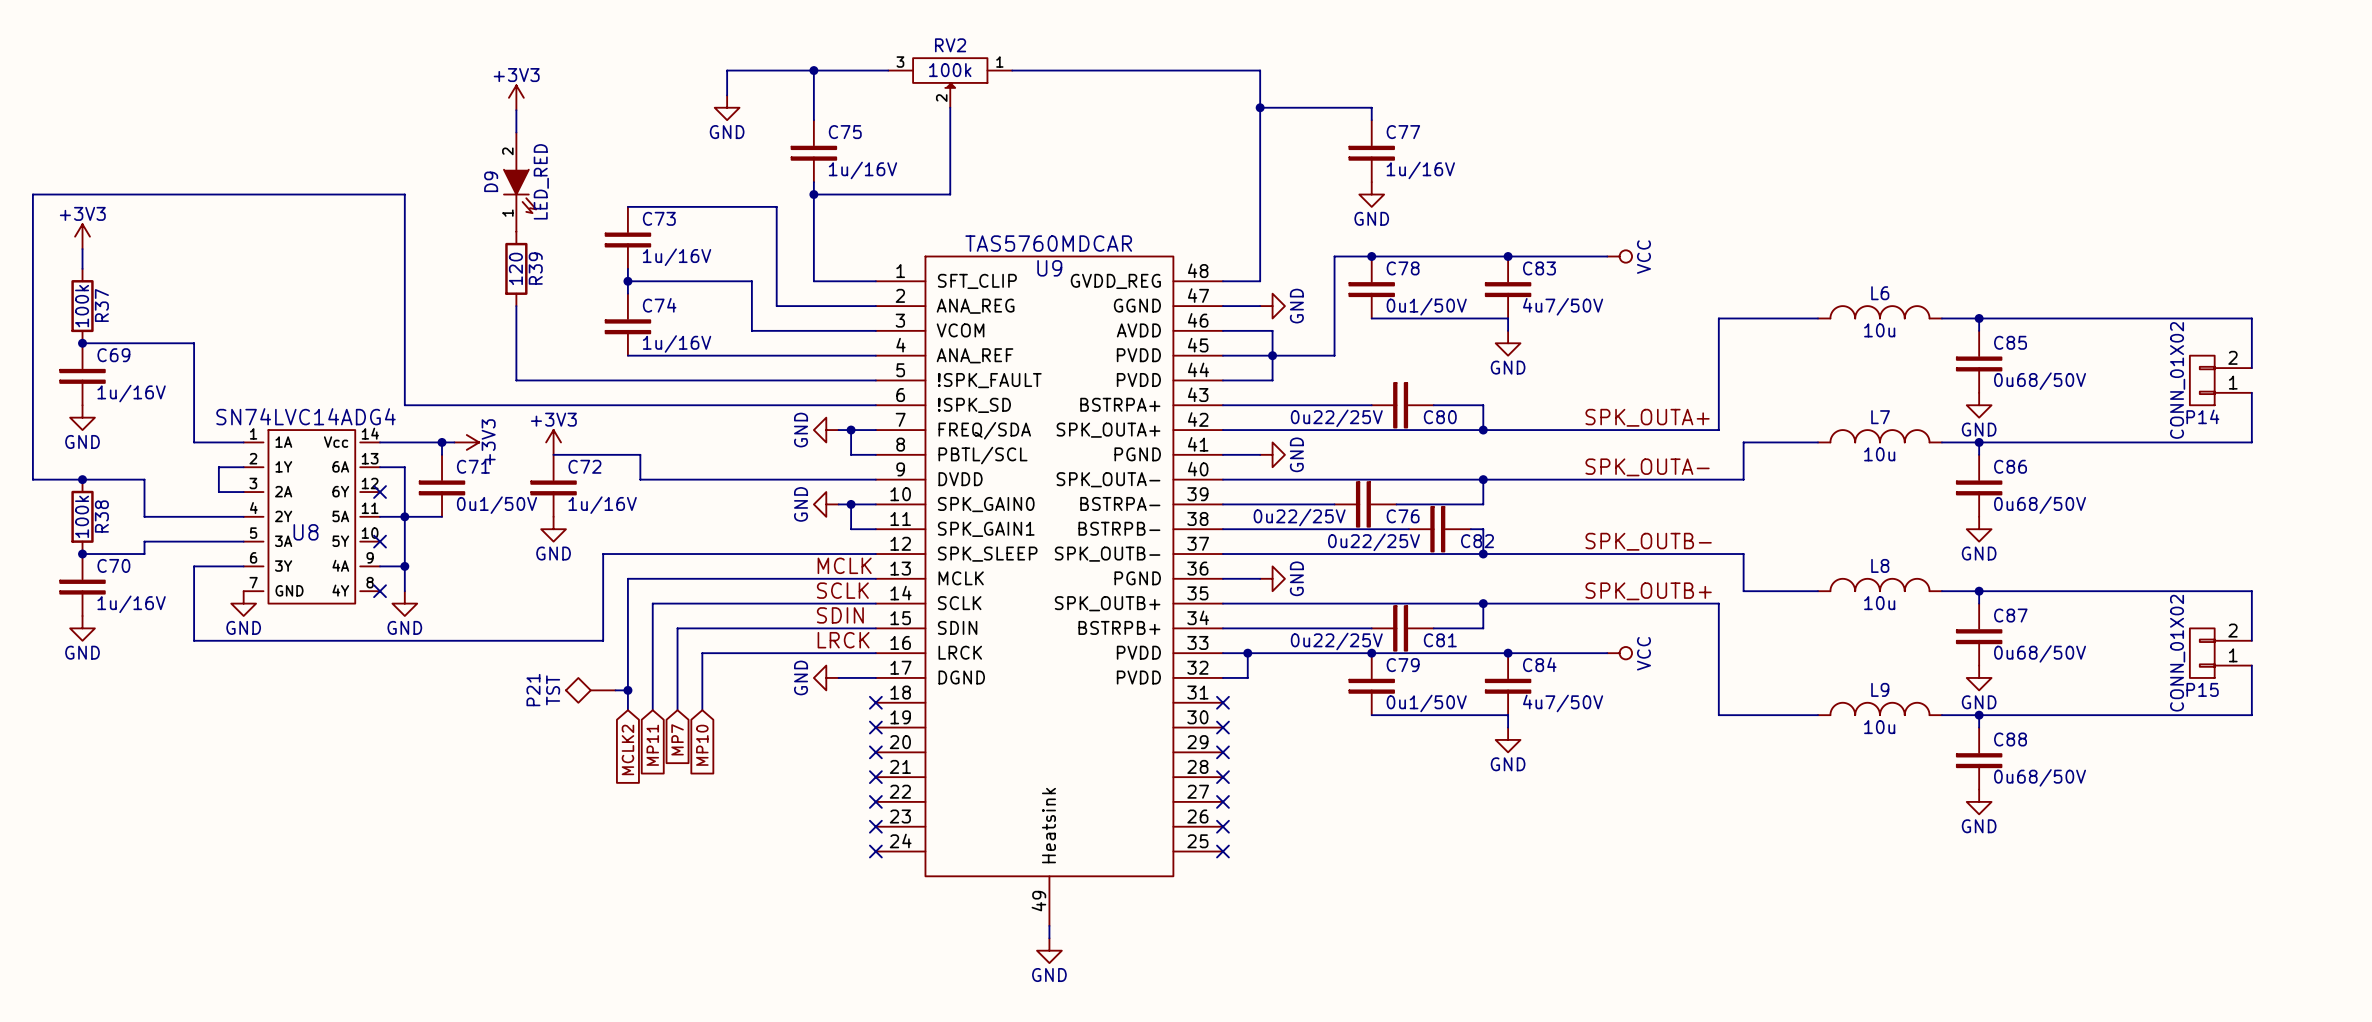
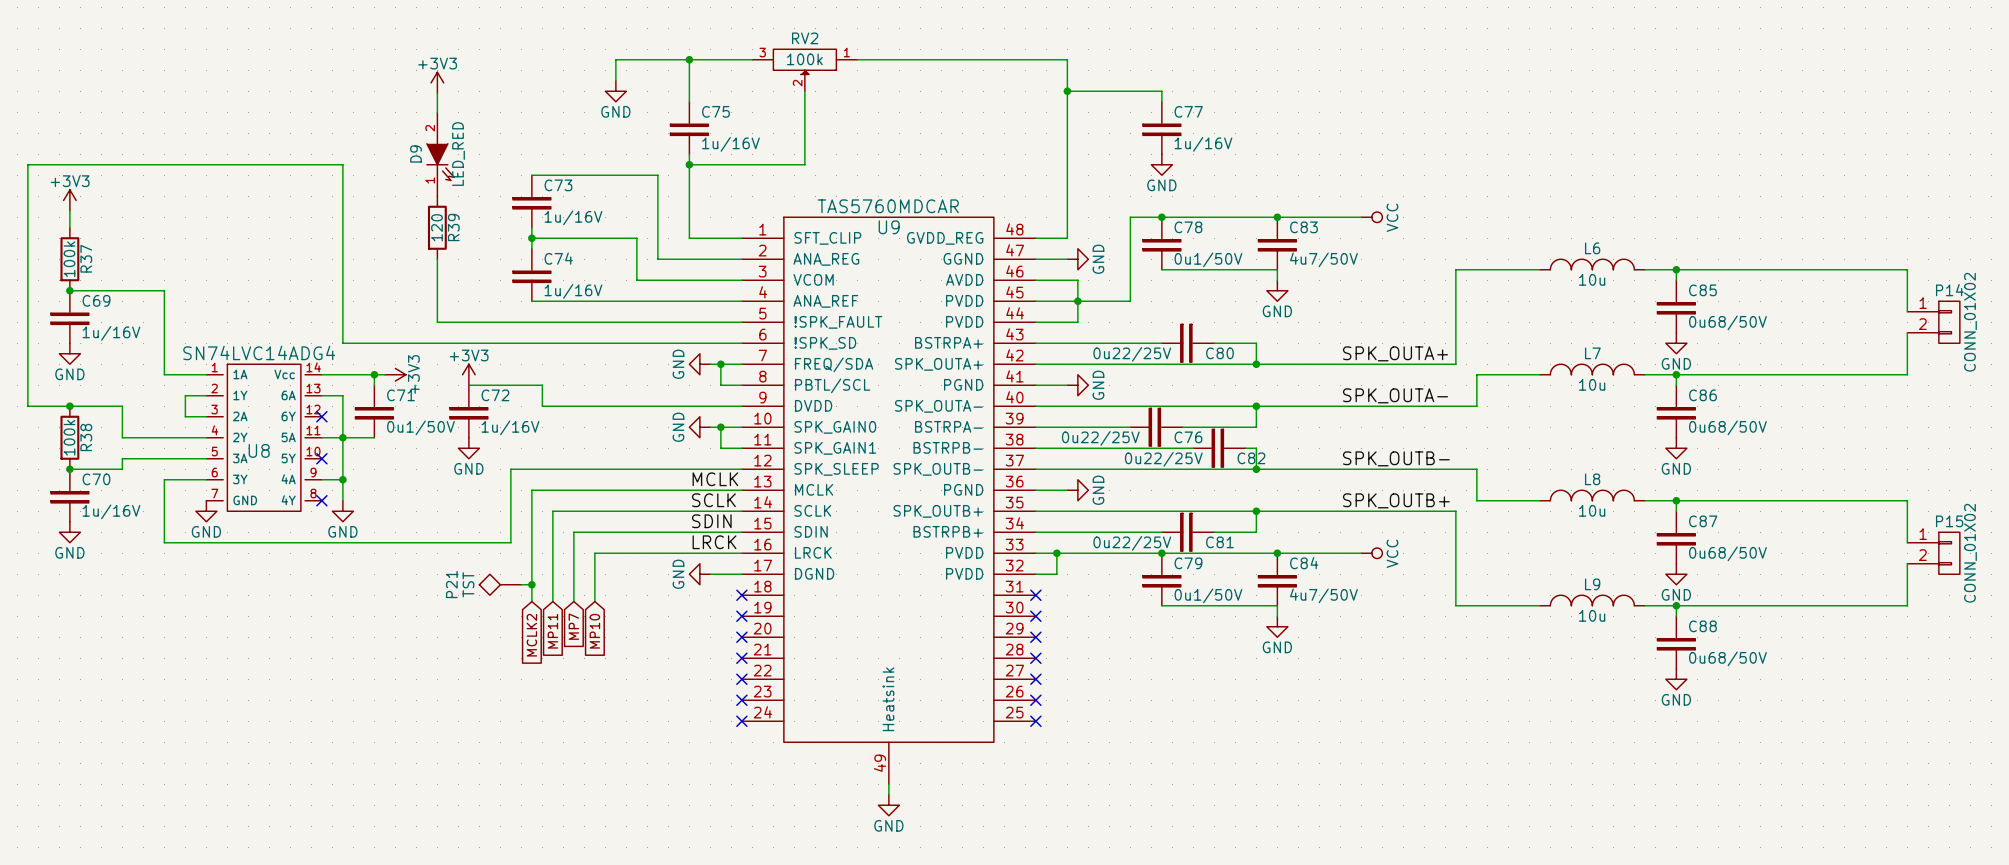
P14 rotation: 0° (2202, 380) -> 180° (1949, 322)
P14 position: (2220, 380) -> (1933, 322)
P15 rotation: 0° (2202, 653) -> 180° (1949, 553)
P15 position: (2220, 653) -> (1933, 553)

